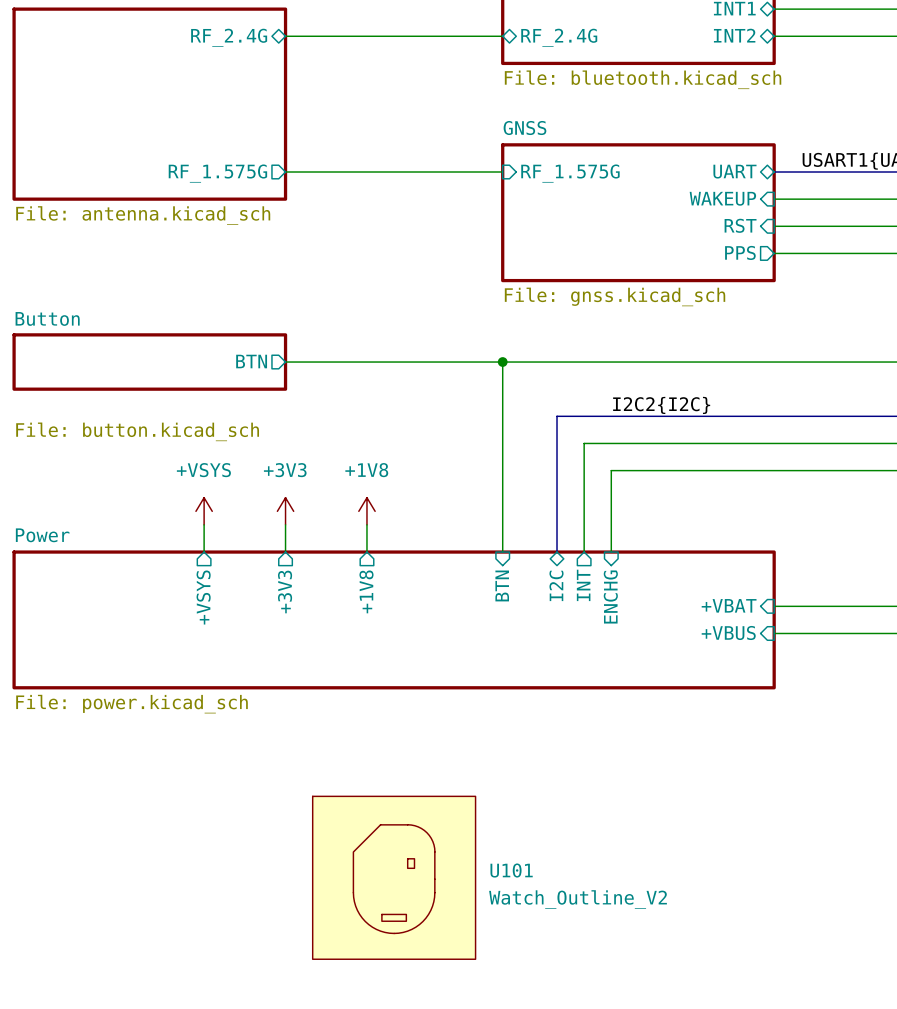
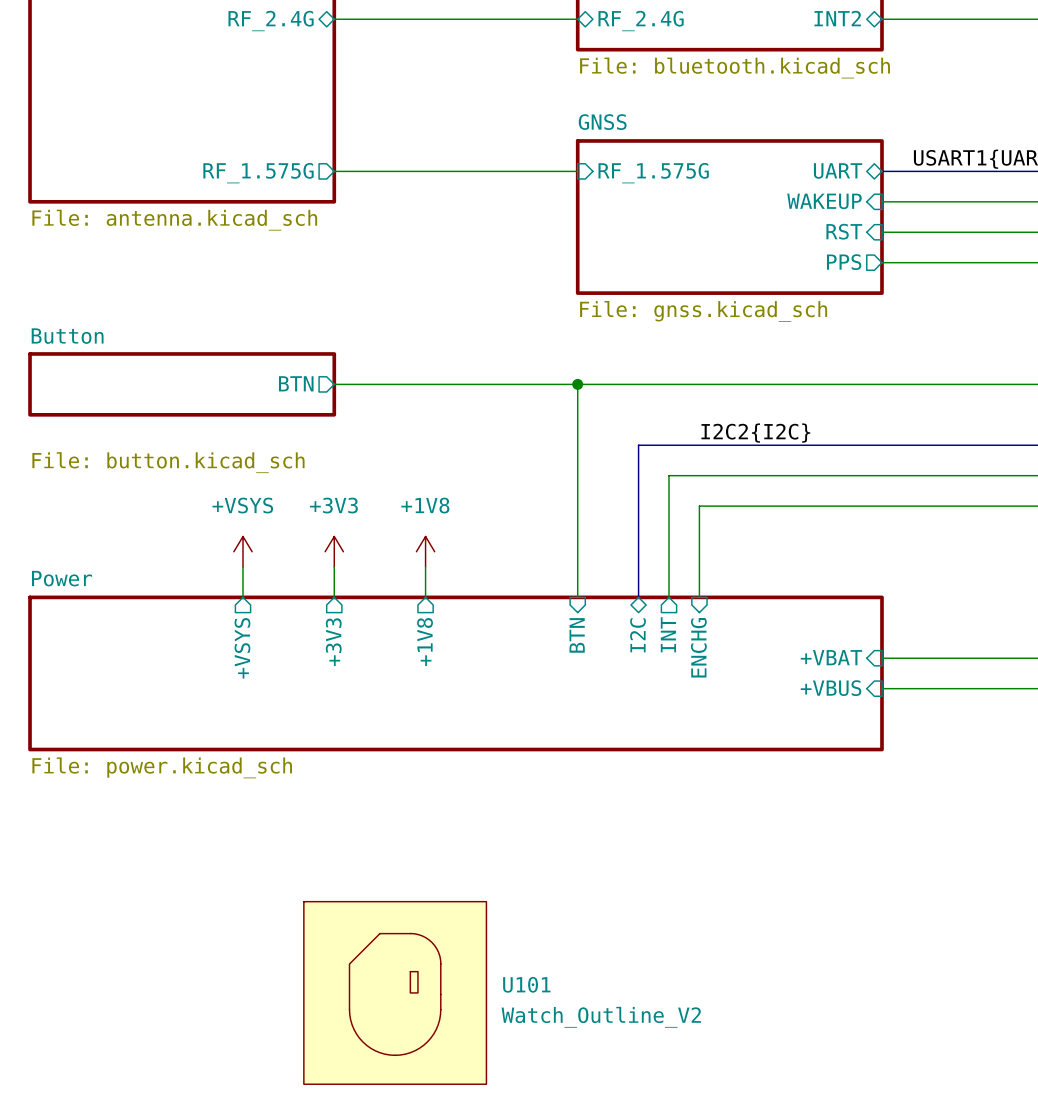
U101 symbol: [312, 796, 476, 960] -> [303, 901, 487, 1085]

